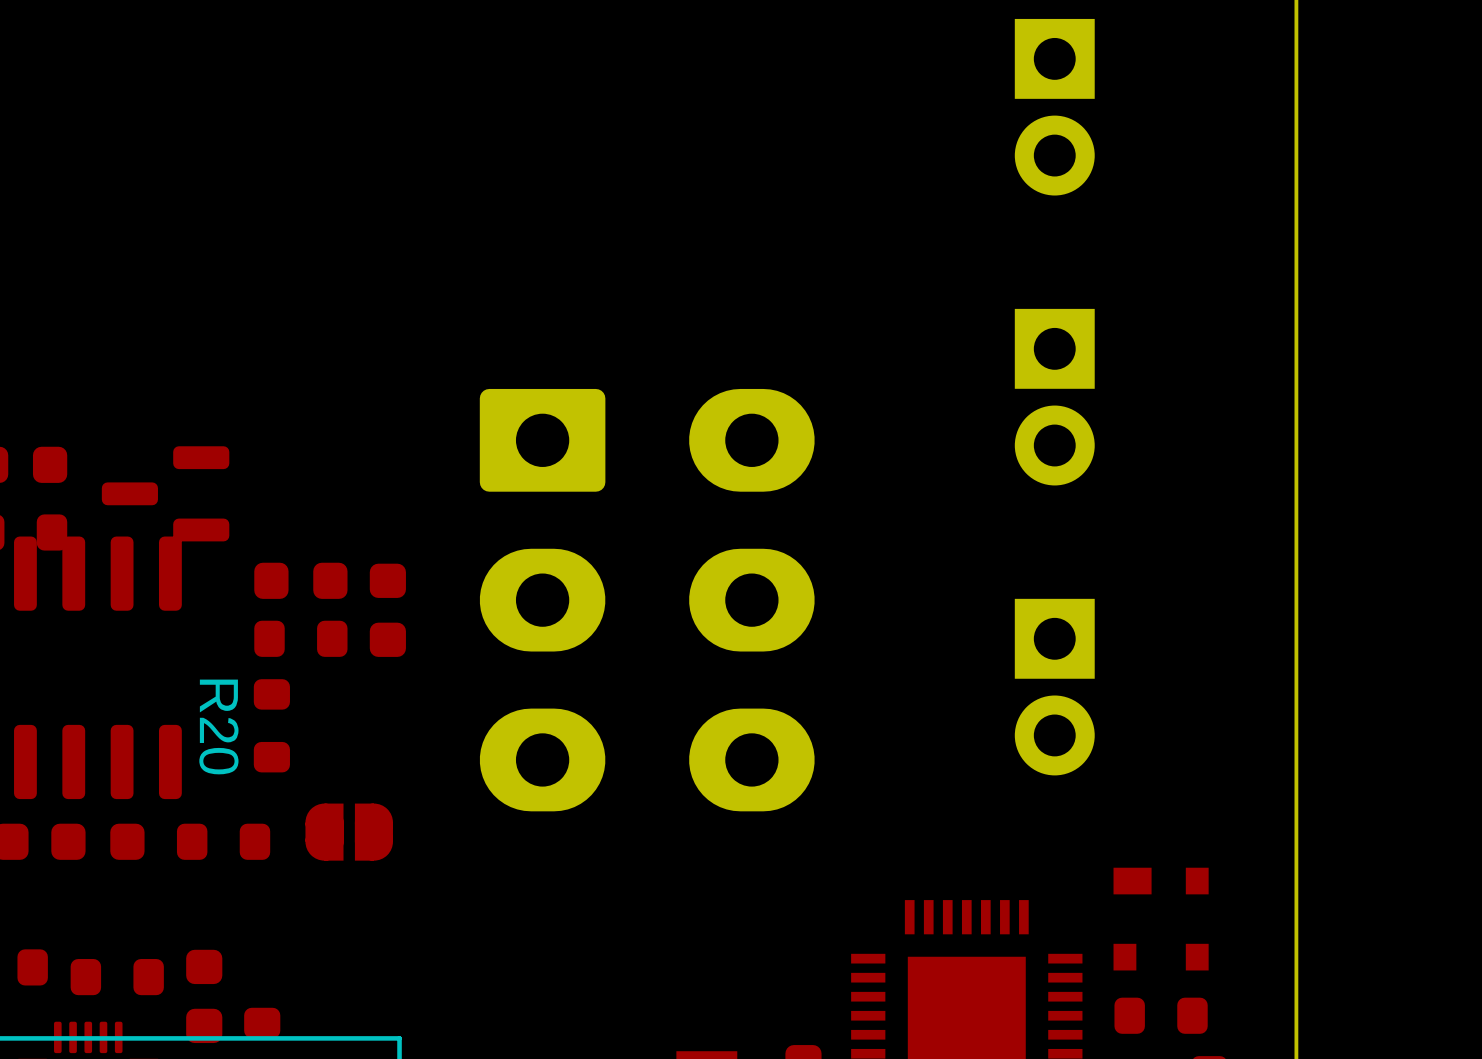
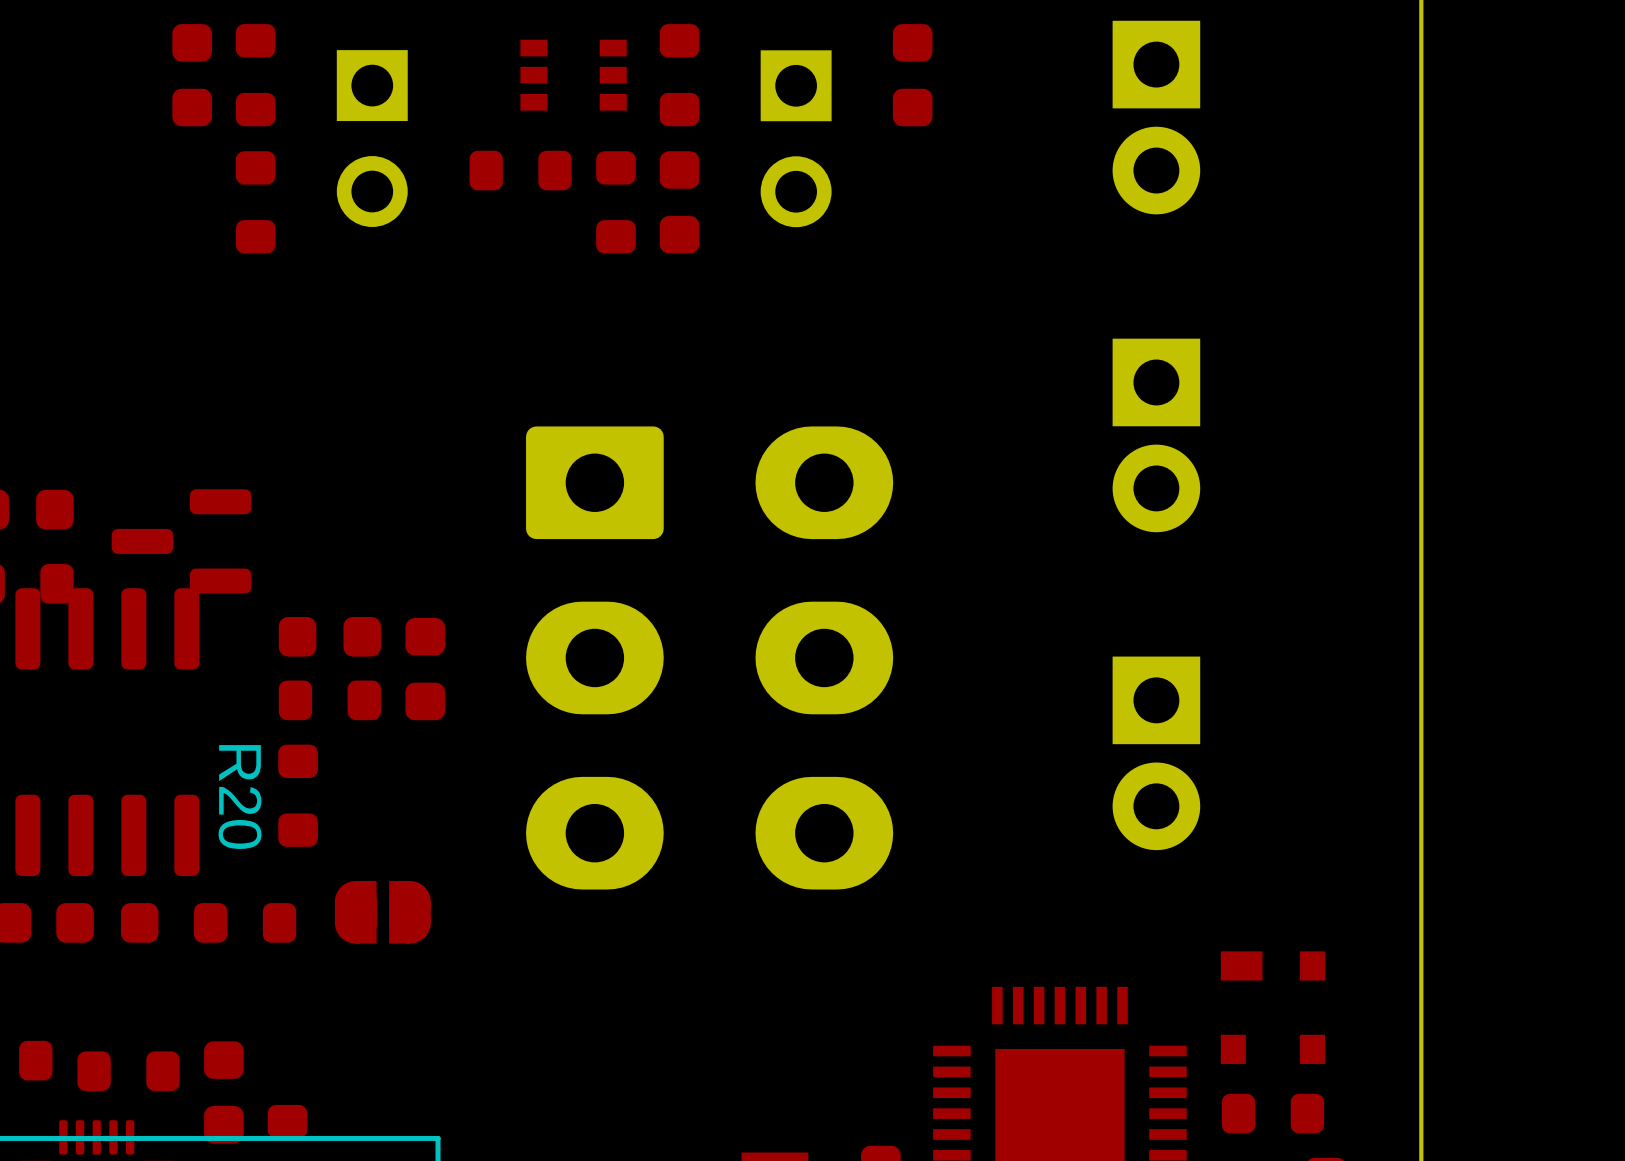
part: none -> (192, 75)
part: none -> (255, 75)
part: none -> (573, 75)
part: none -> (679, 75)
part: none -> (912, 75)
part: none -> (372, 138)
part: none -> (796, 138)
part: none -> (520, 170)
part: none -> (255, 202)
part: none -> (615, 202)
part: none -> (679, 202)

